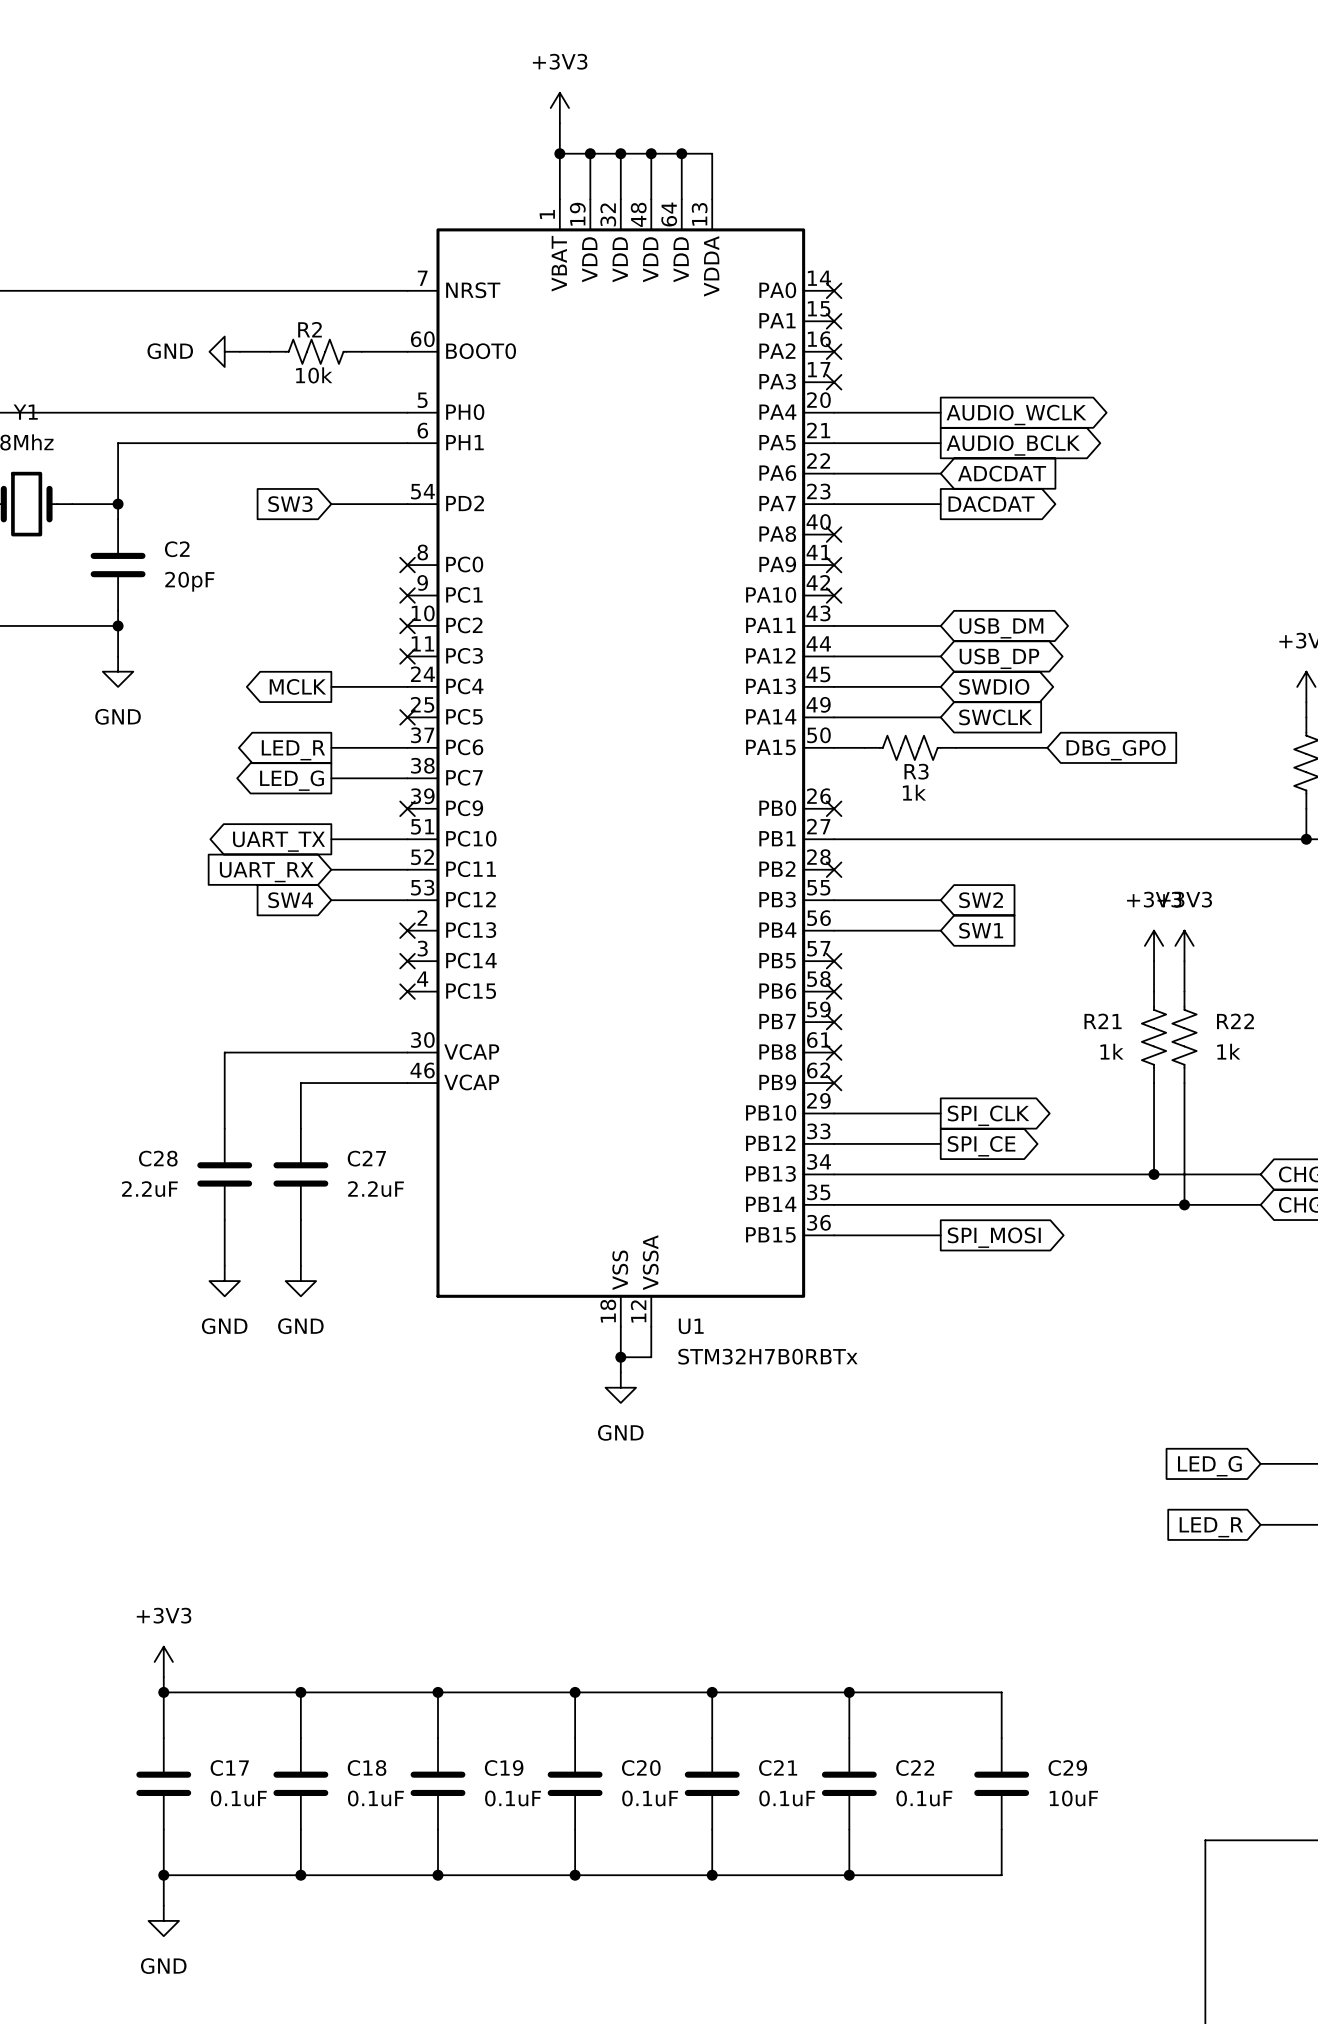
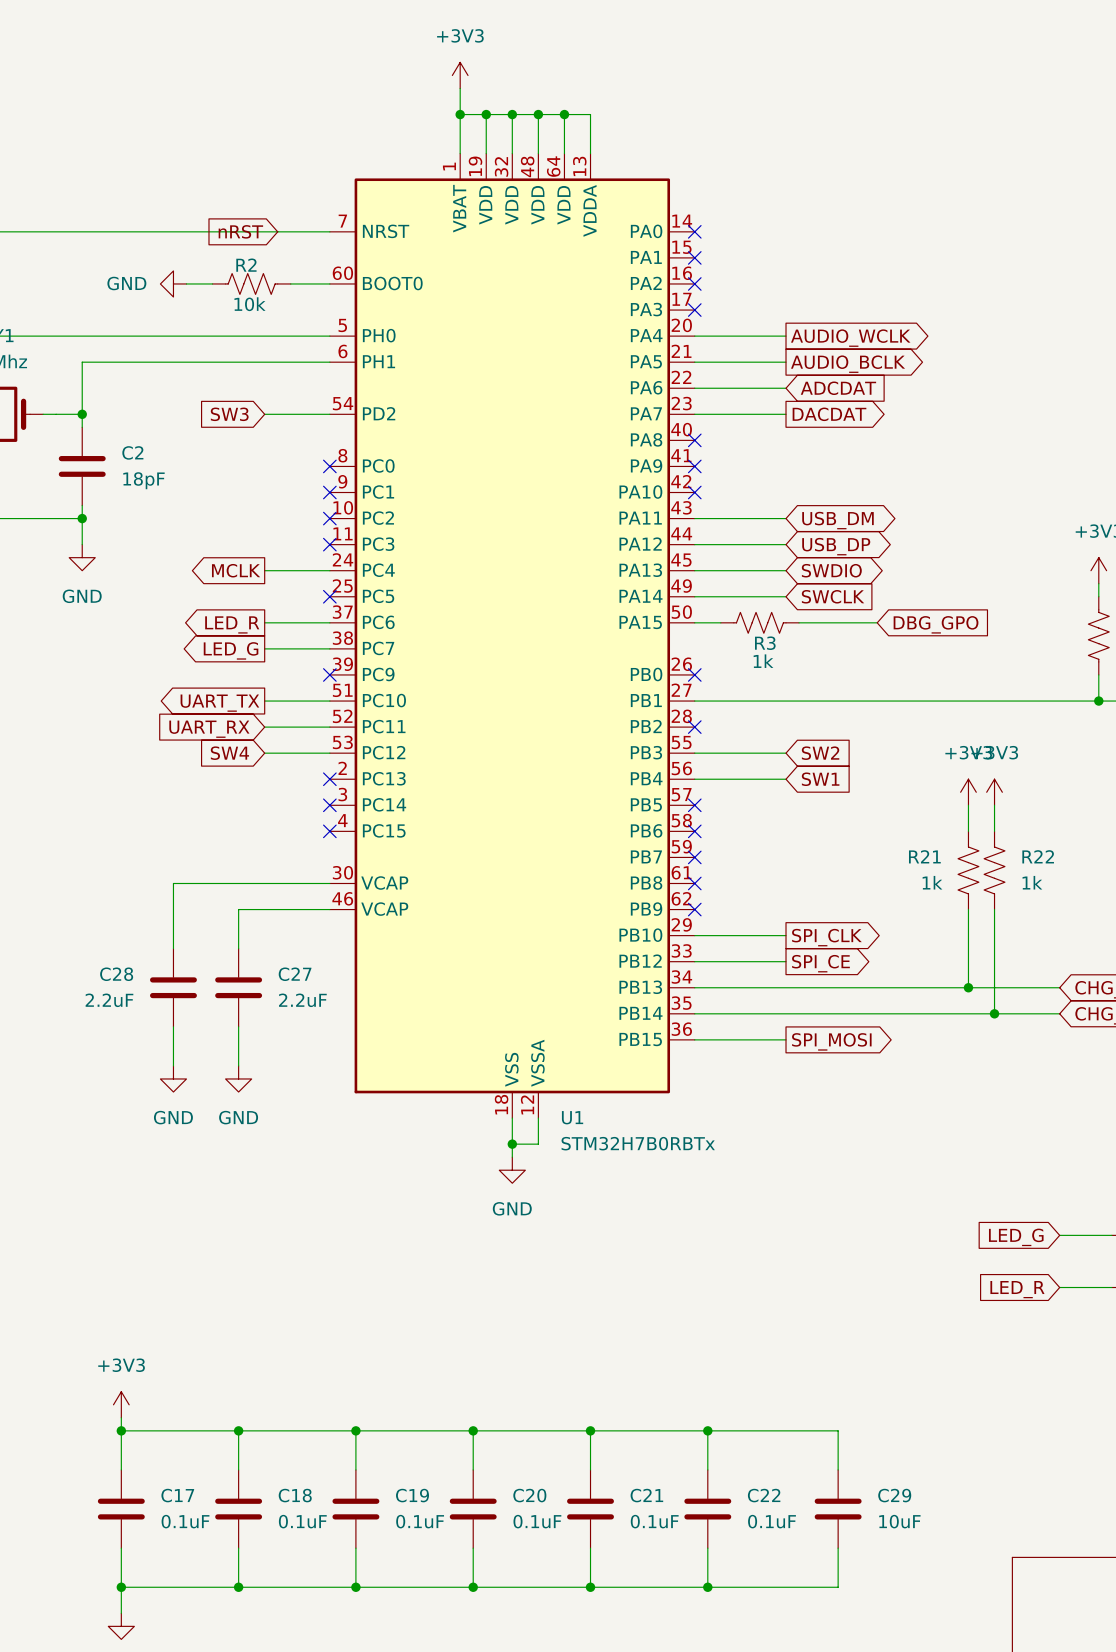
global label: none -> nRST (240, 231)
C2 value: 20pF (189, 581) -> 18pF (143, 480)

